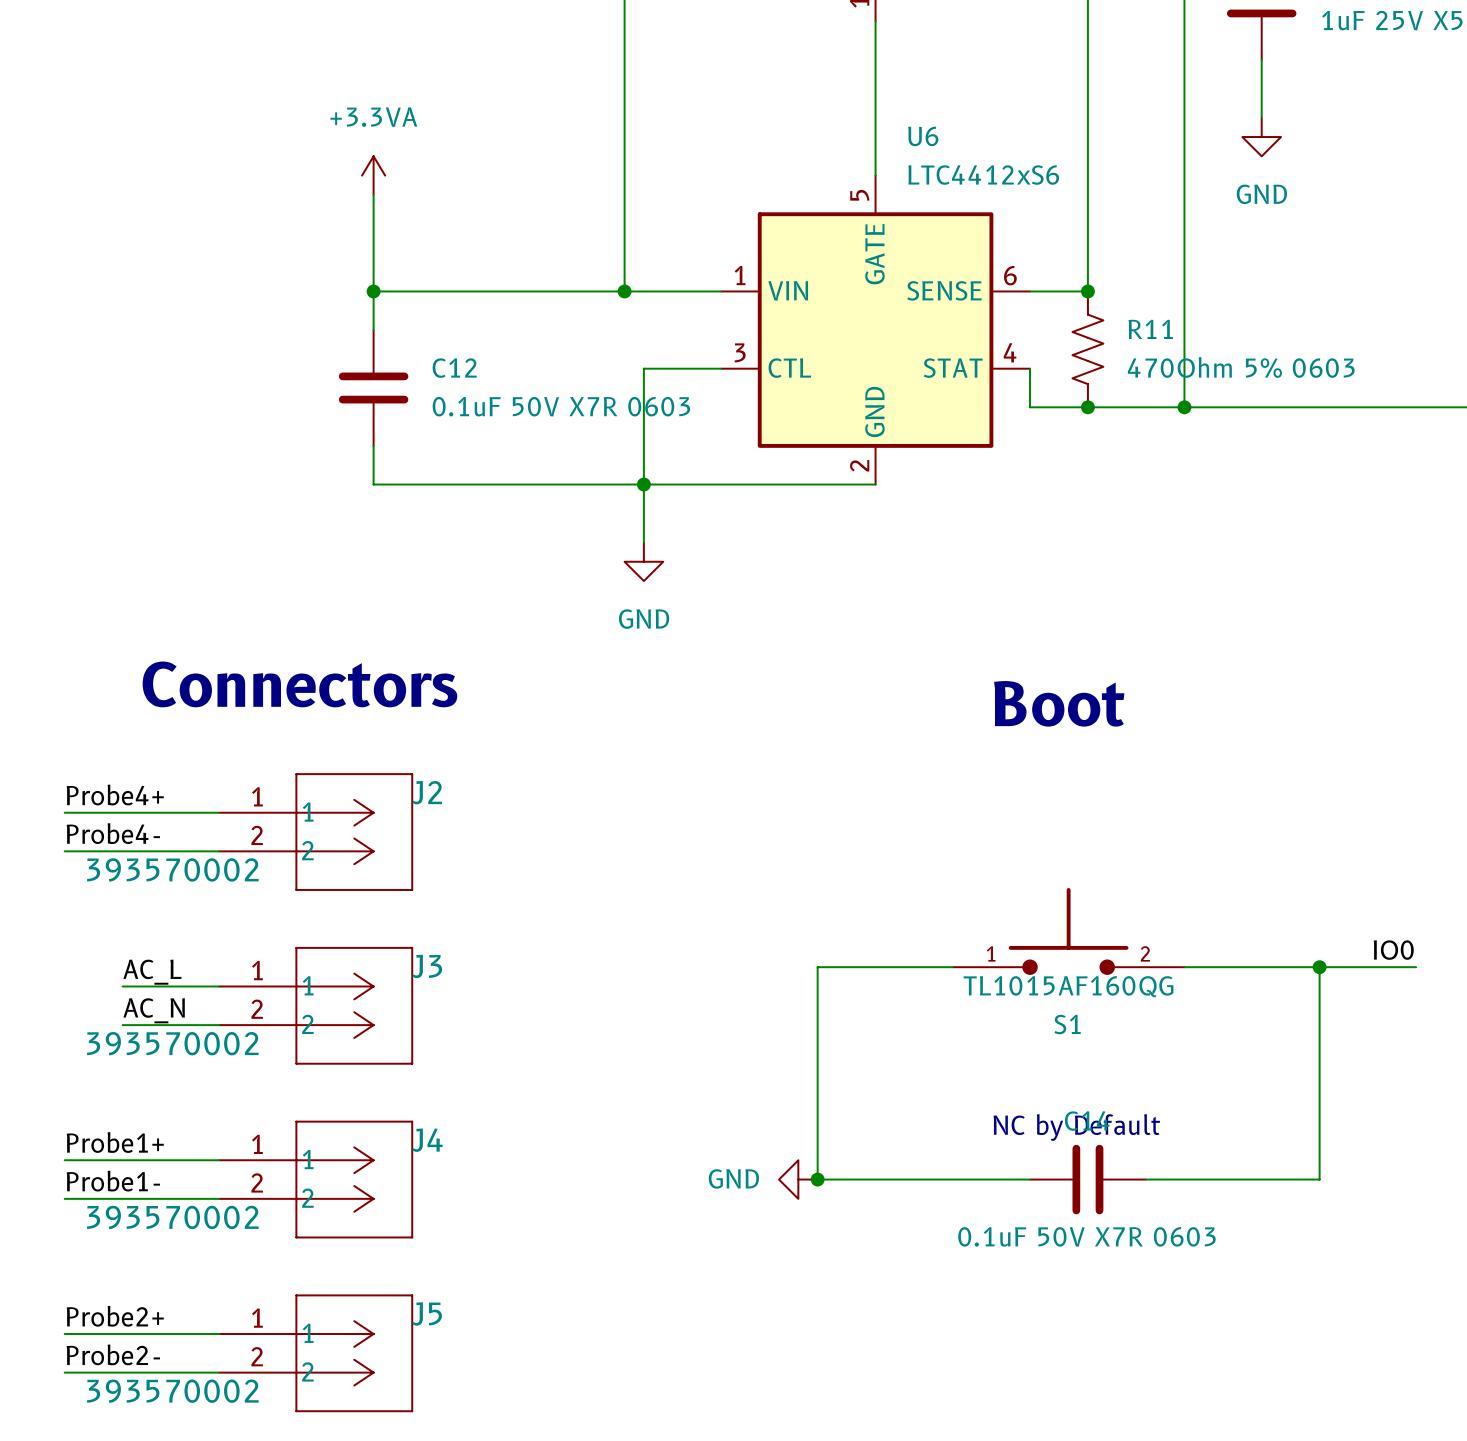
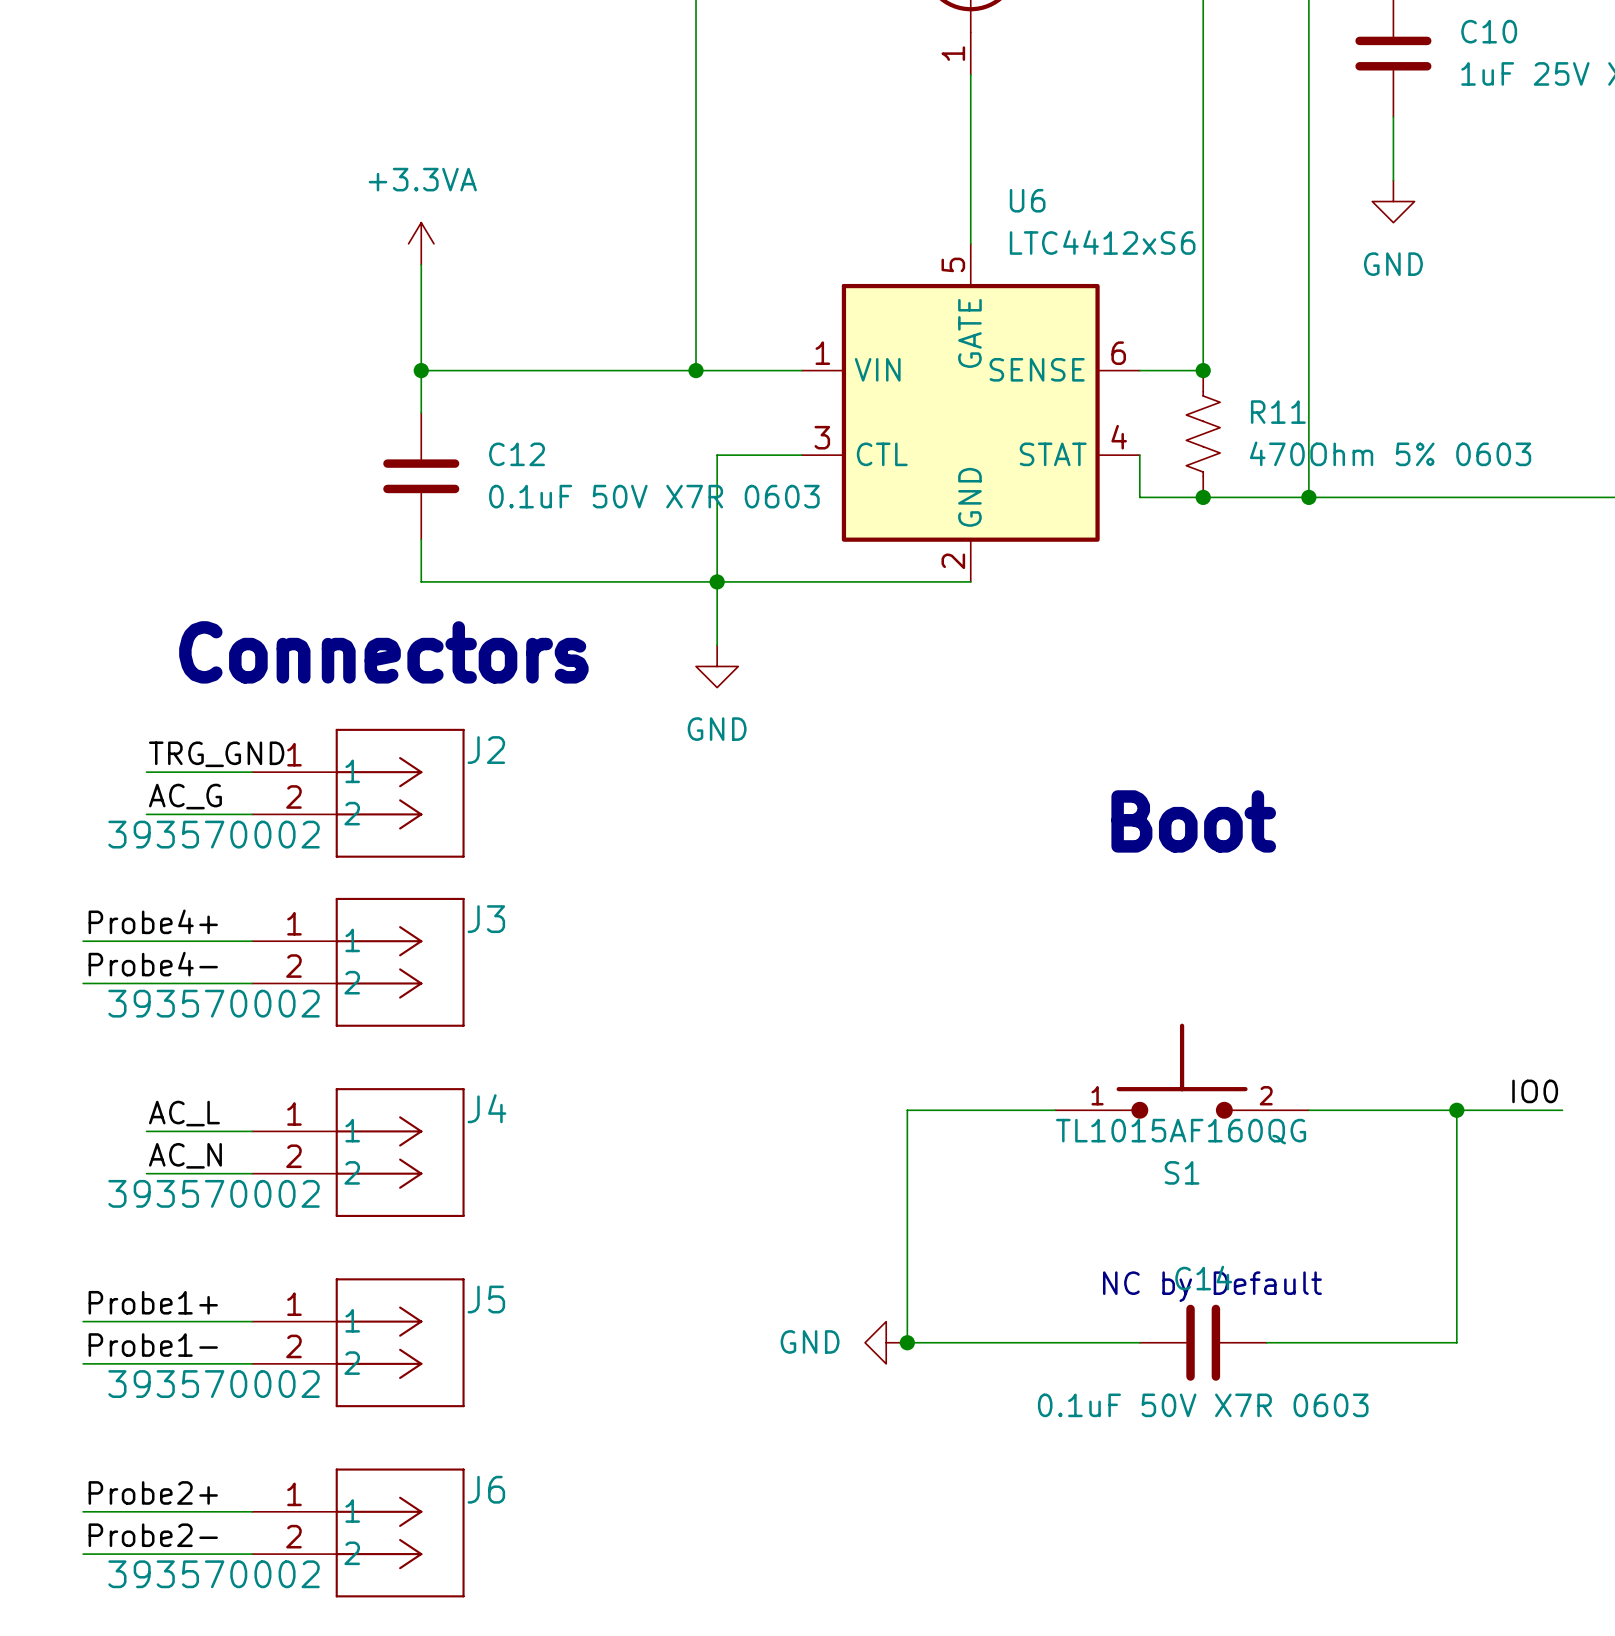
label: none -> TRG_GND (216, 754)
wire: none -> (146, 772) (252, 772)
J2: none -> 393570002 (358, 793)
label: none -> AC_G (185, 796)
text position: Connectors (299, 684) -> Connectors (383, 652)
wire: none -> (146, 814) (252, 814)
J2 name: J2 (427, 792) -> J3 (486, 919)
J3 name: J3 (427, 966) -> J4 (486, 1108)
J4 name: J4 (427, 1140) -> J5 (486, 1299)
J5 name: J5 (427, 1313) -> J6 (486, 1489)

